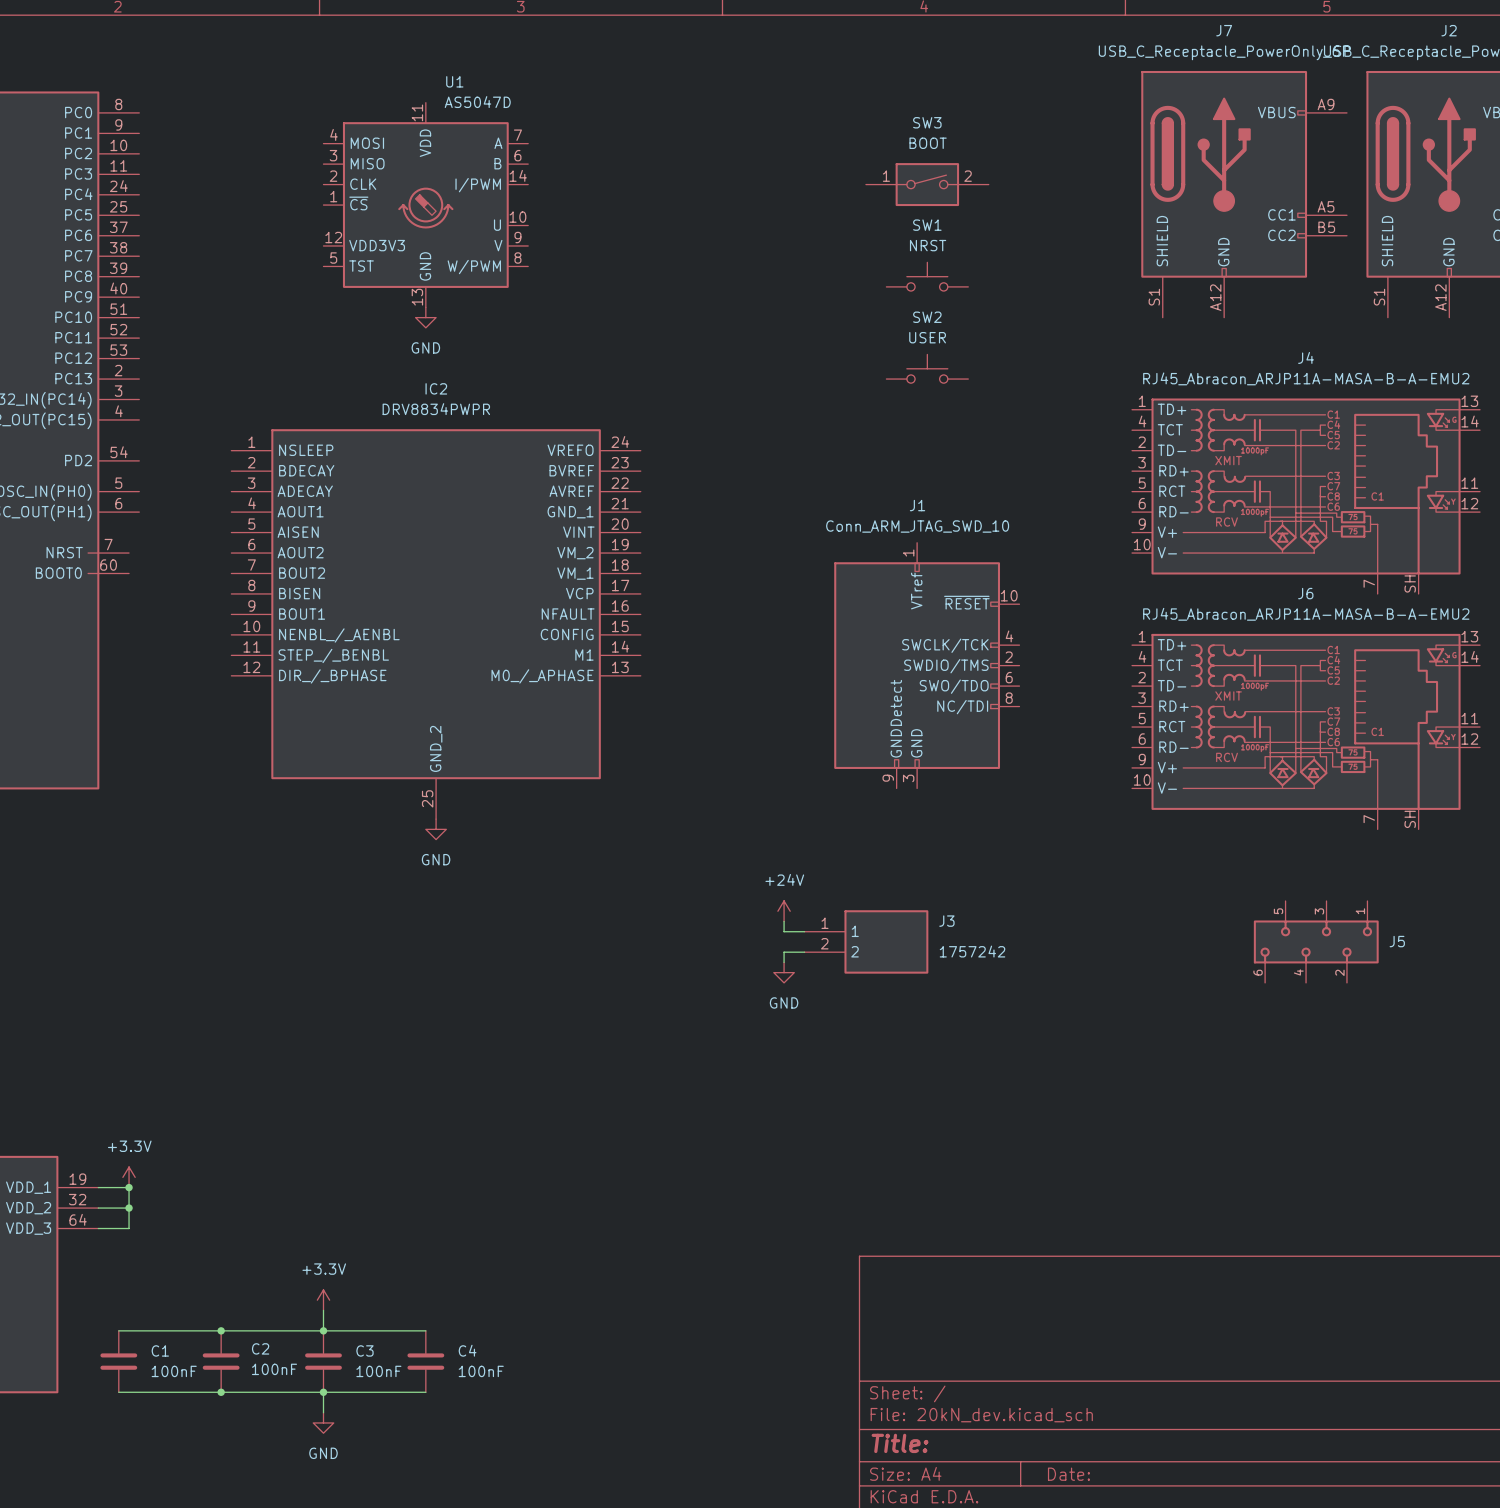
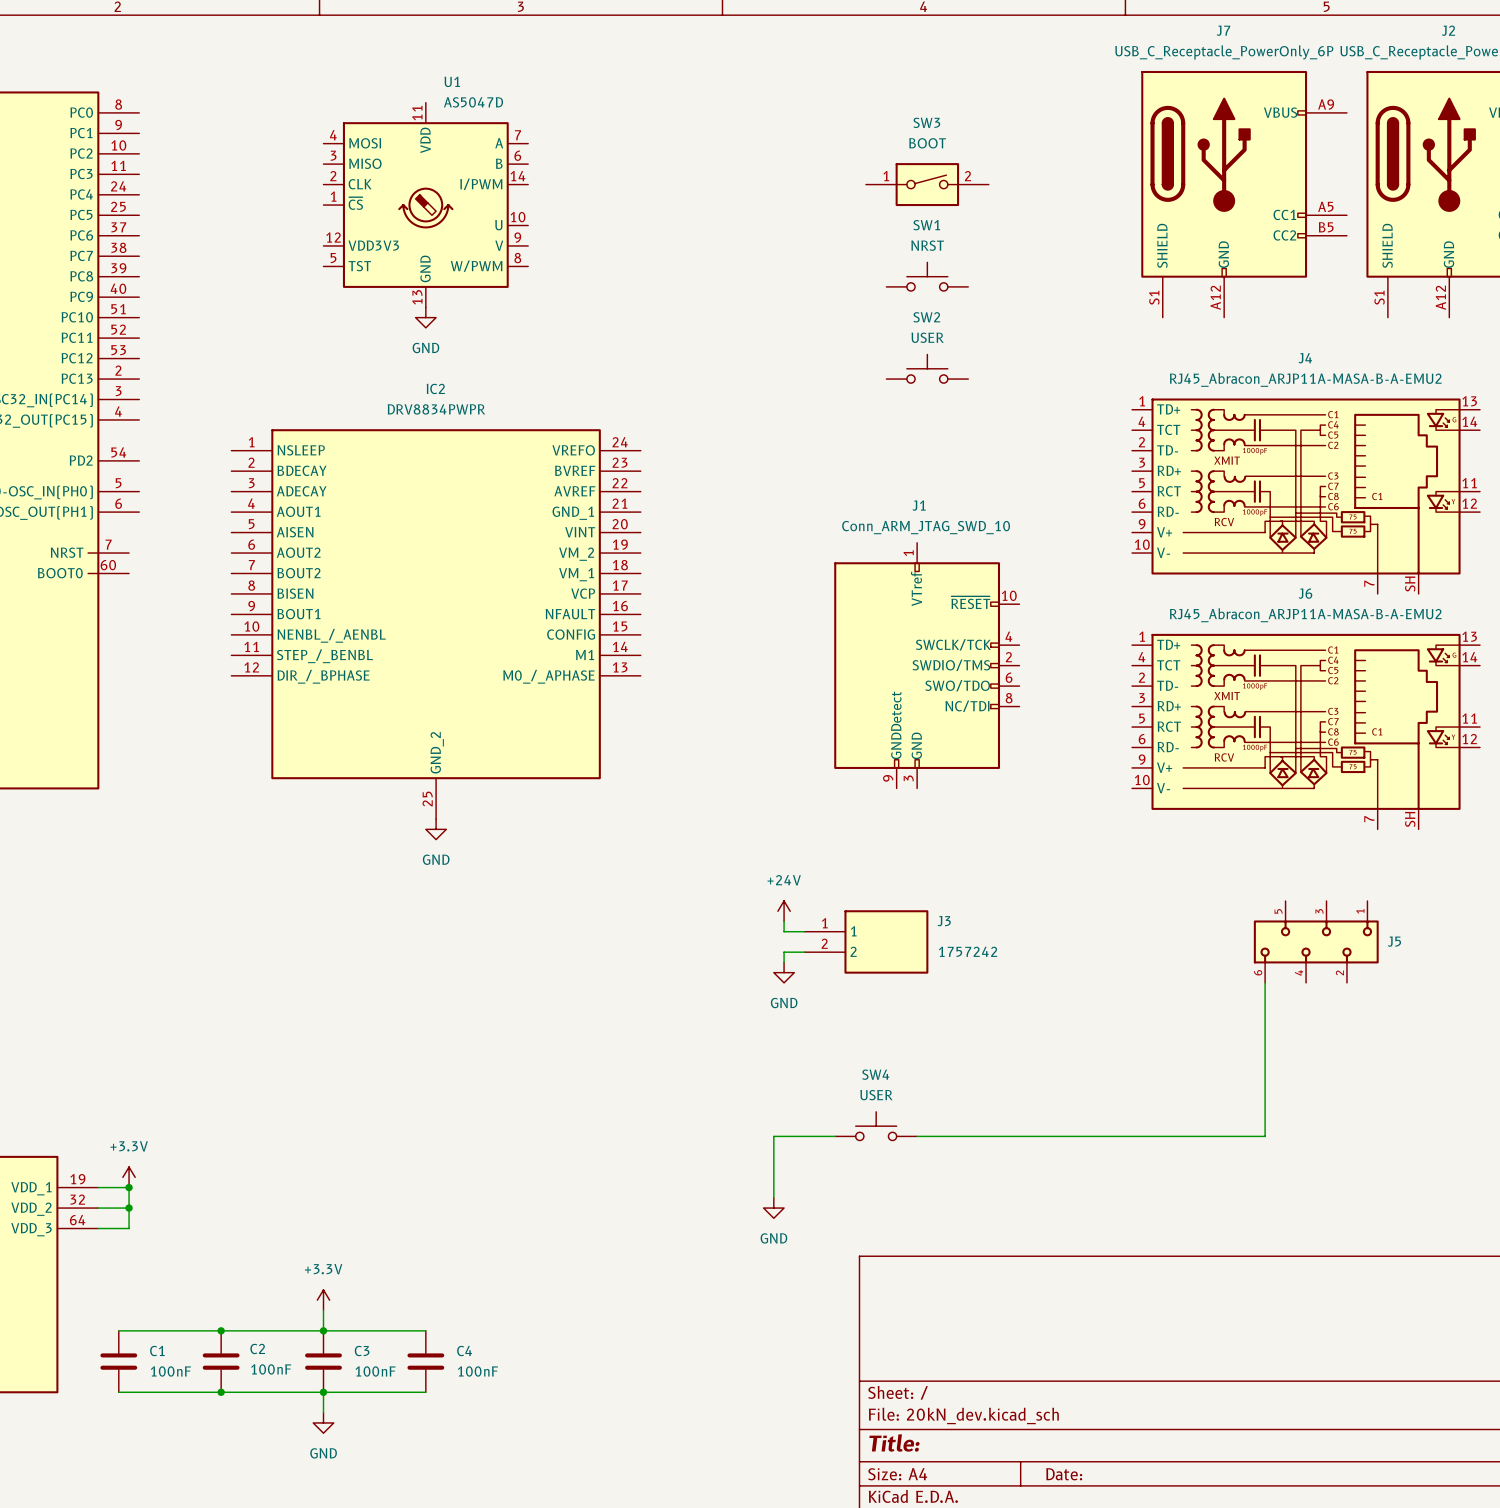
wire: none -> (1265, 982) (1265, 1136) (917, 1136)
SW4: none -> USER (876, 1126)
wire: none -> (835, 1136) (773, 1136) (773, 1197)
power symbol: none -> GND (773, 1208)

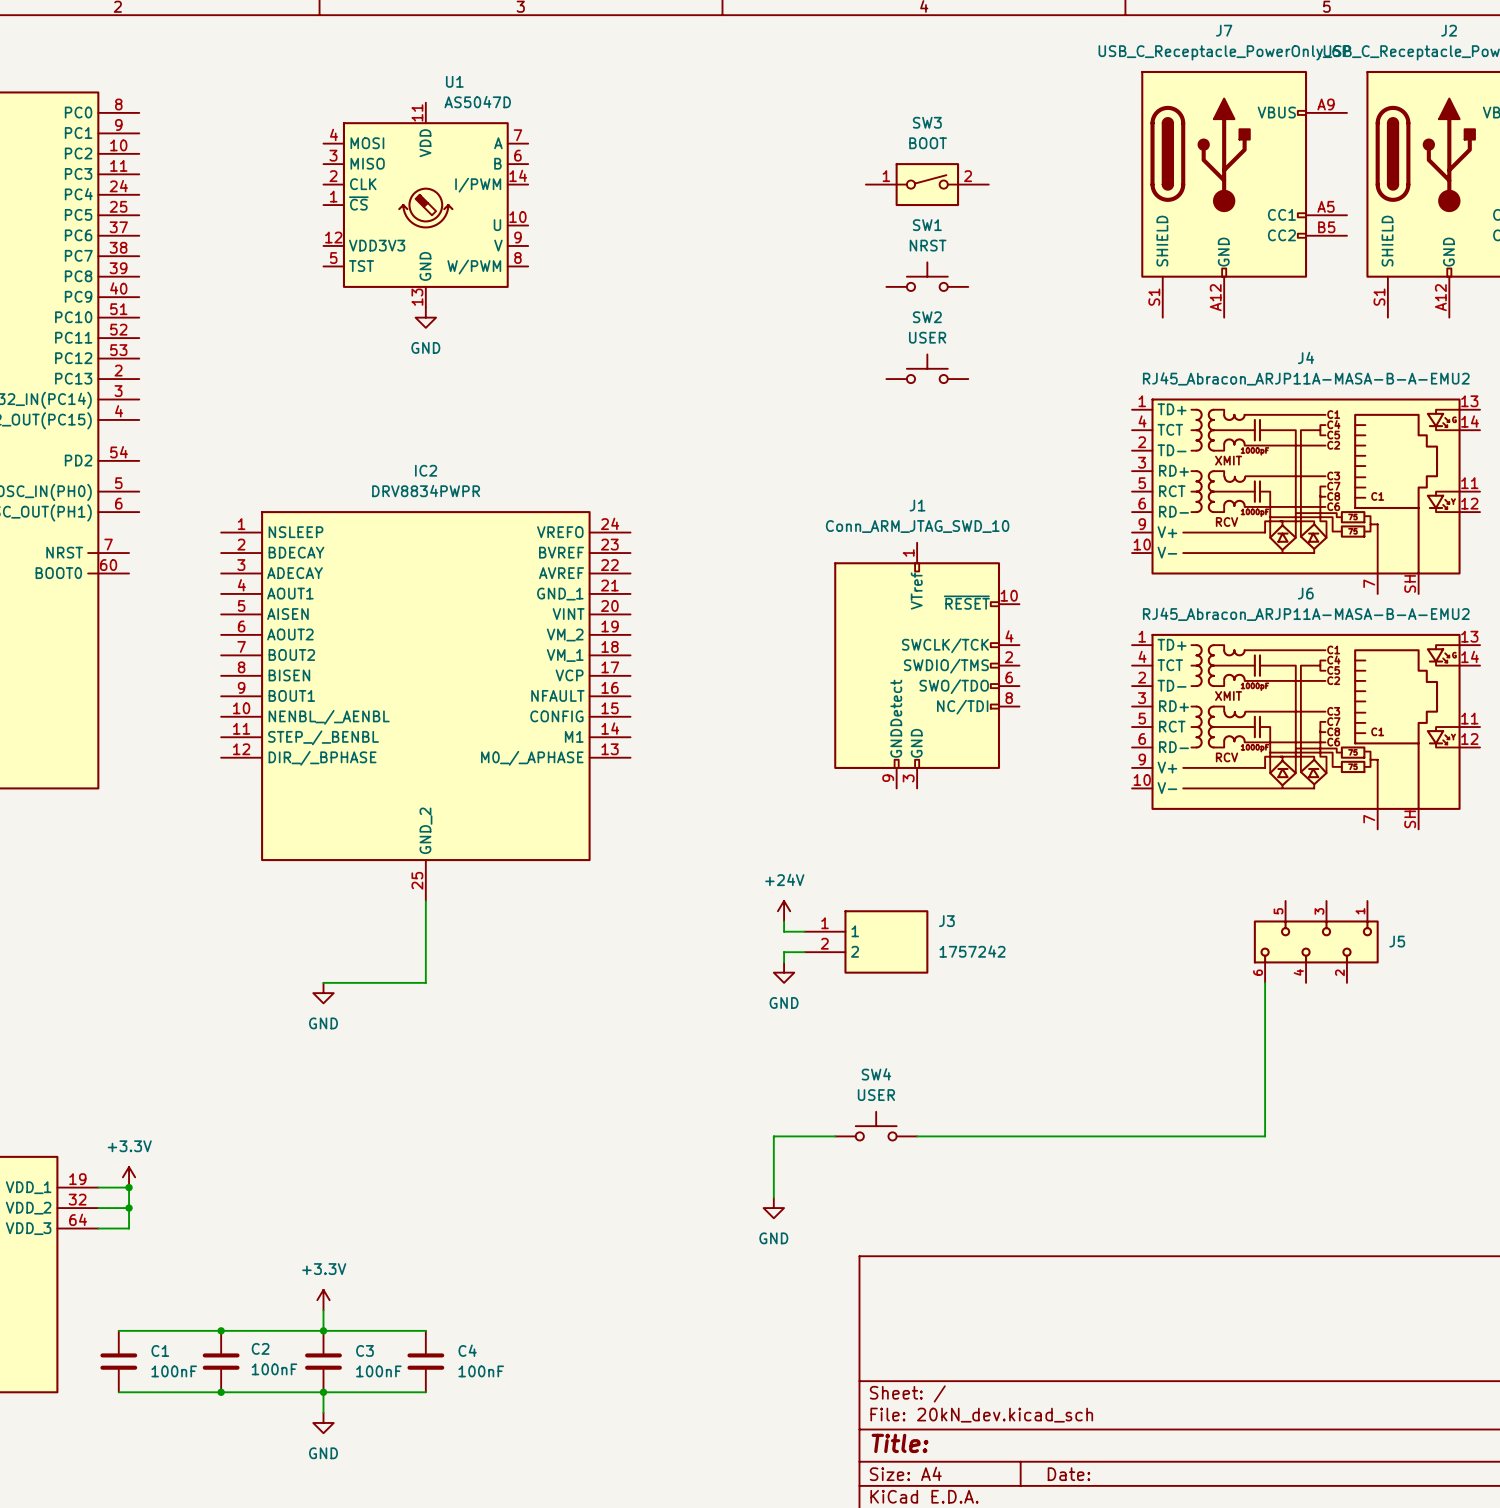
IC2 position: (436, 624) -> (425, 706)
power symbol position: GND (436, 829) -> GND (323, 993)
wire: none -> (425, 901) (425, 982) (323, 982)

